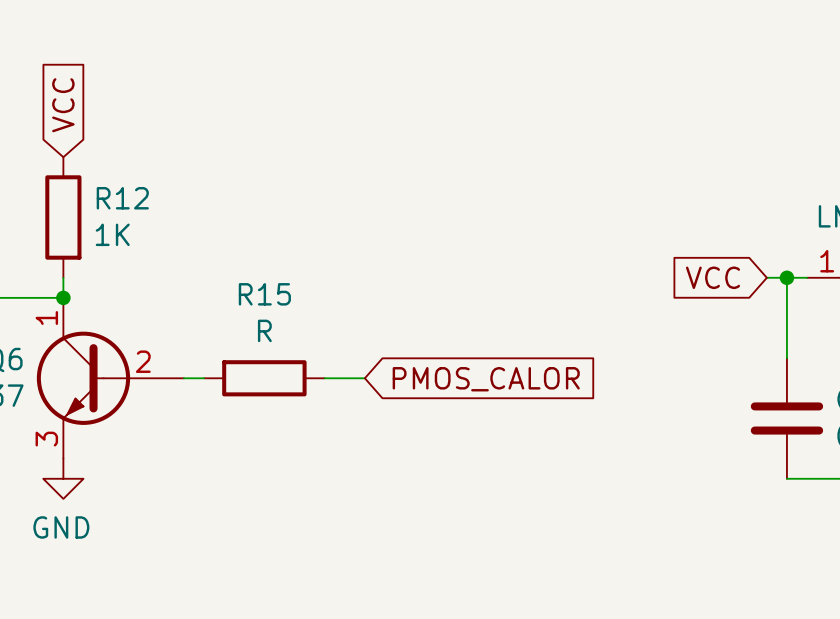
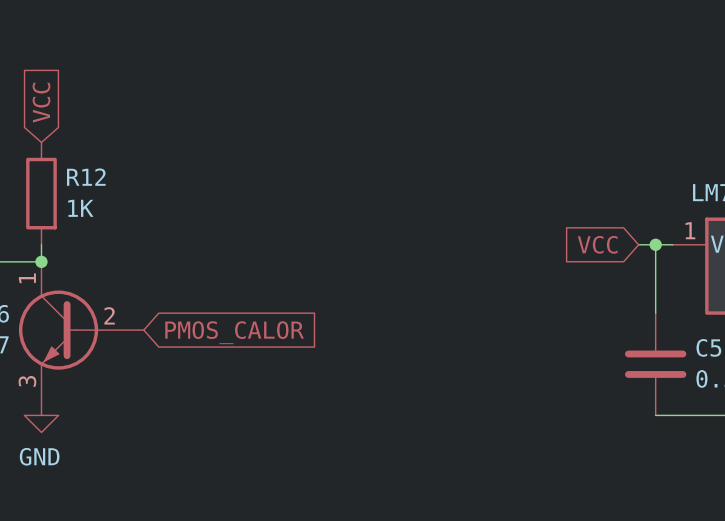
wire: (183, 378) (204, 378) -> none
R15: R (264, 378) -> none
wire: (324, 378) (364, 378) -> none
global label position: PMOS_CALOR (486, 379) -> PMOS_CALOR (234, 332)

